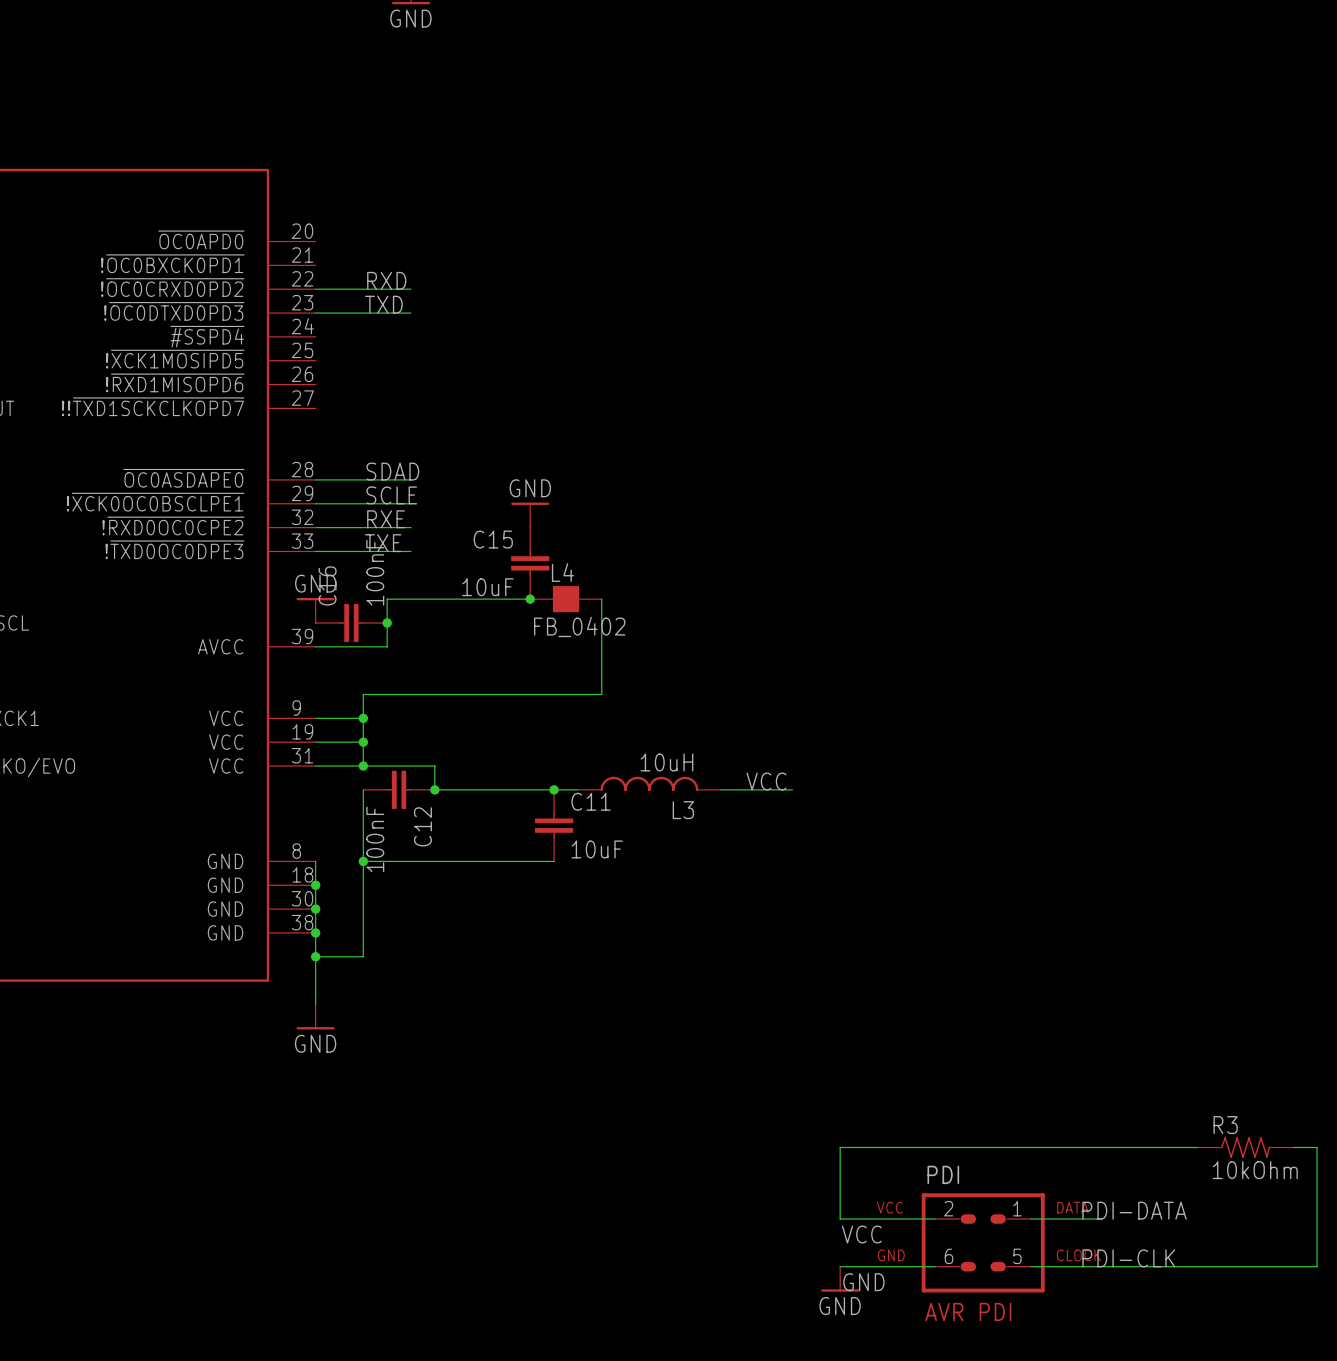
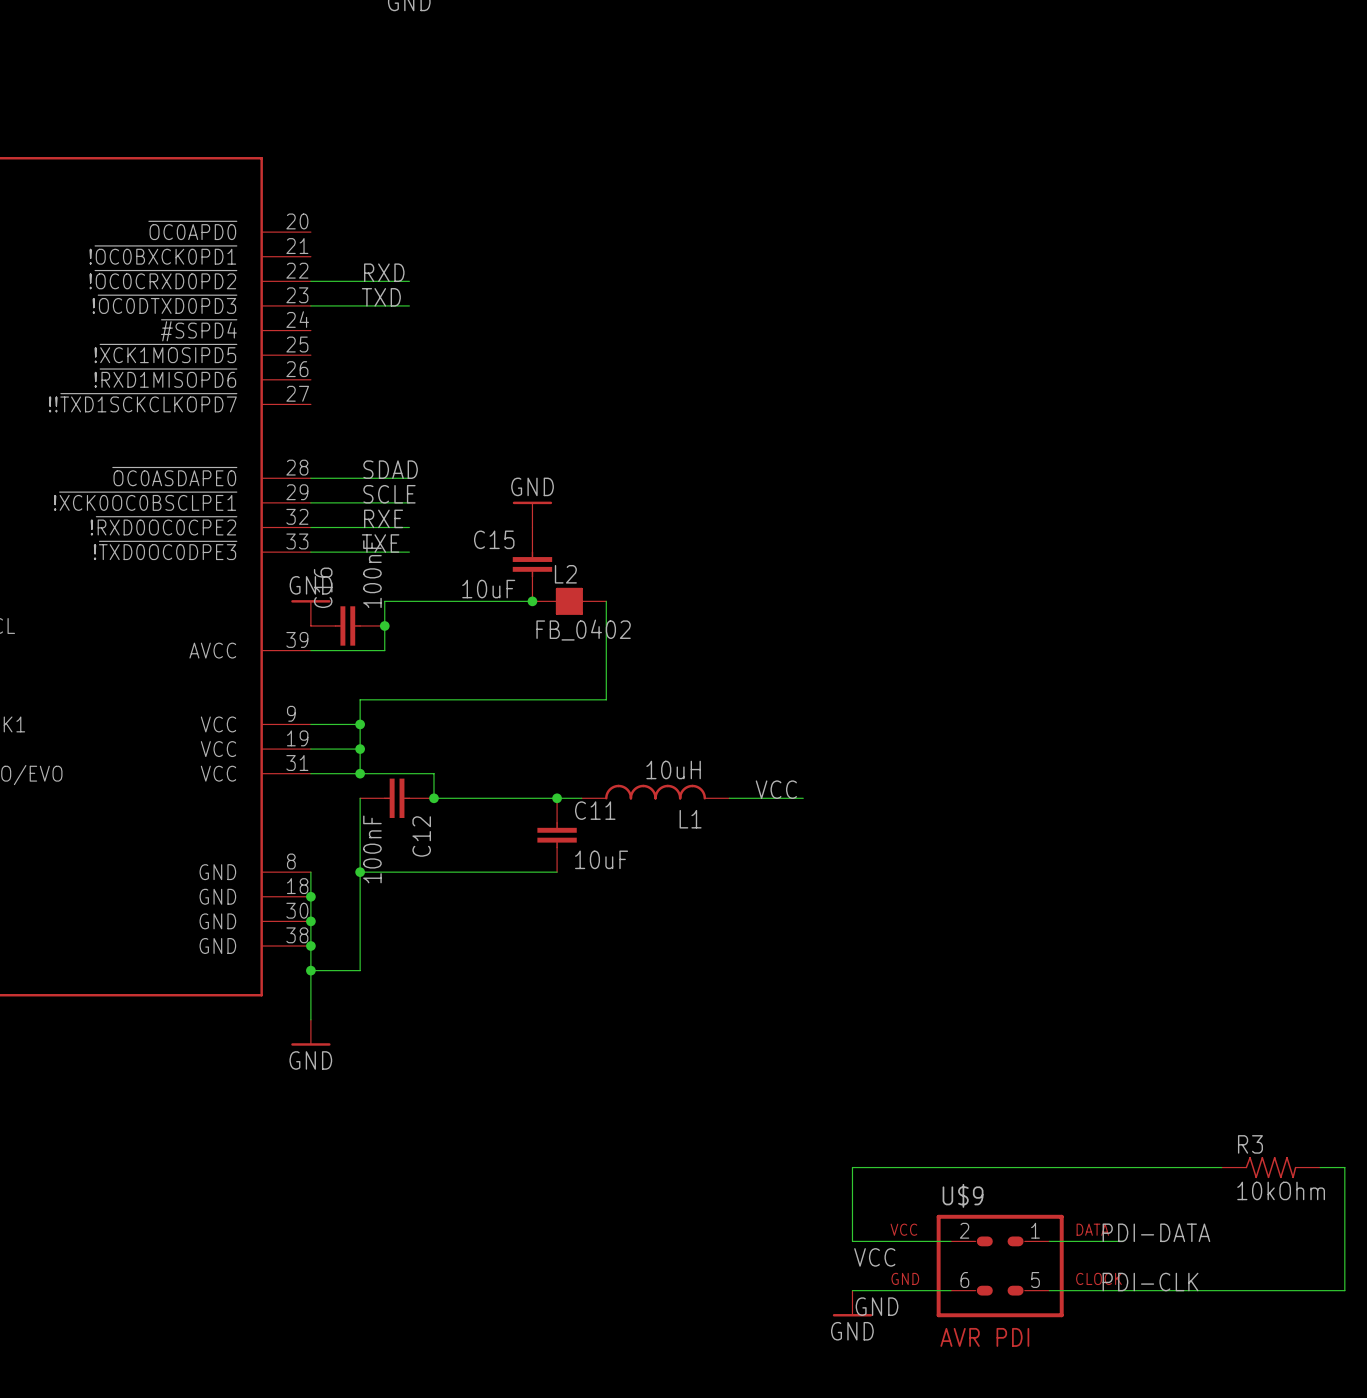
L4 name: L4 (562, 572) -> L2 (565, 574)
L3 name: L3 (683, 810) -> L1 (690, 819)
PDI name: PDI (943, 1174) -> U$9 (963, 1195)

